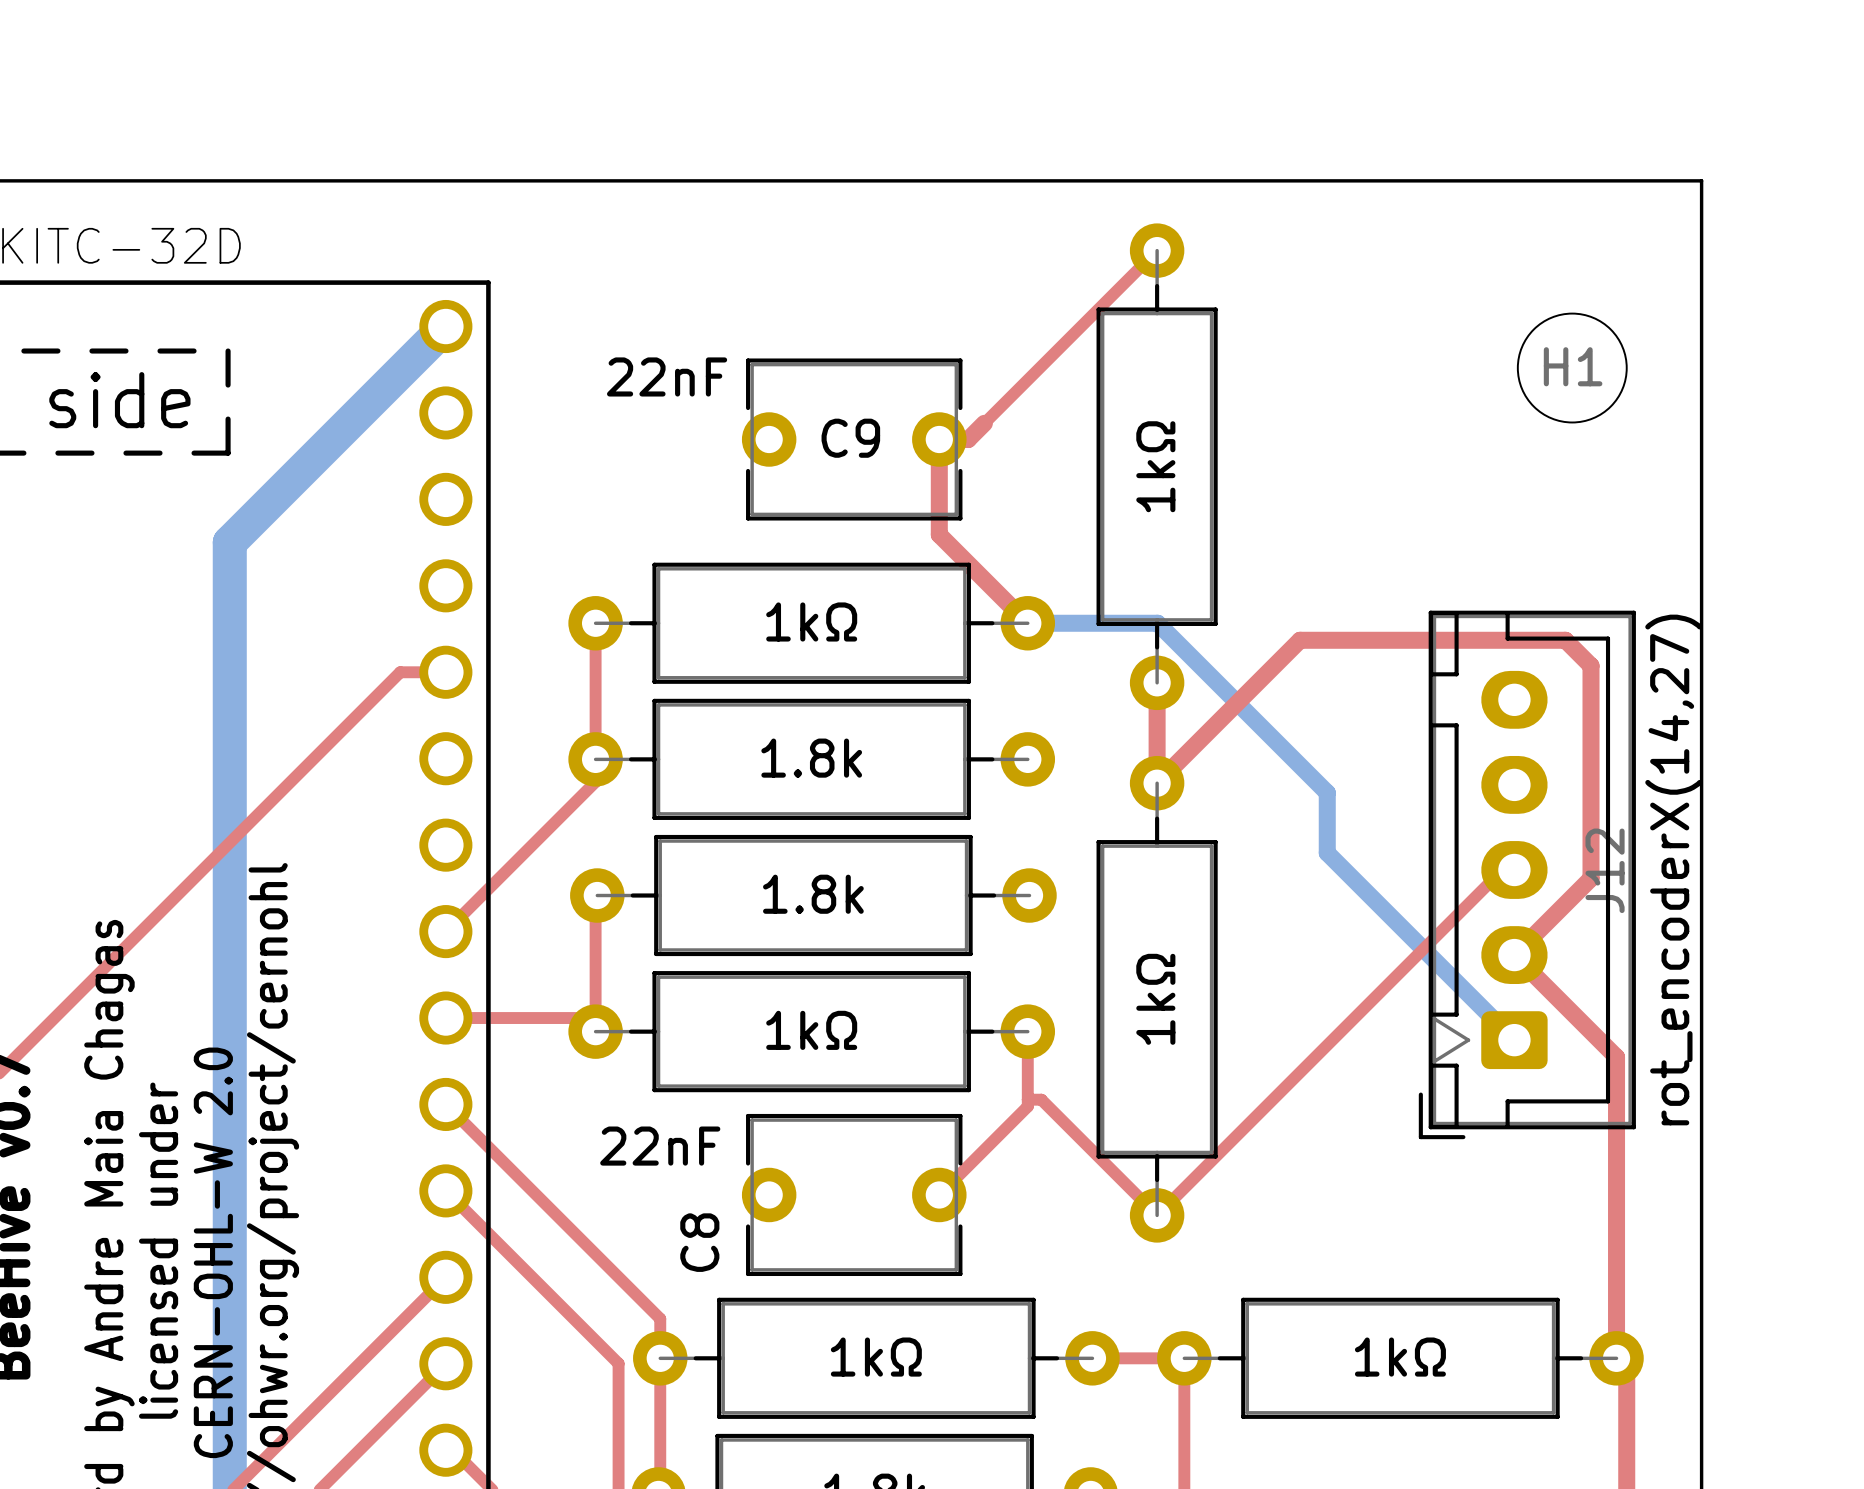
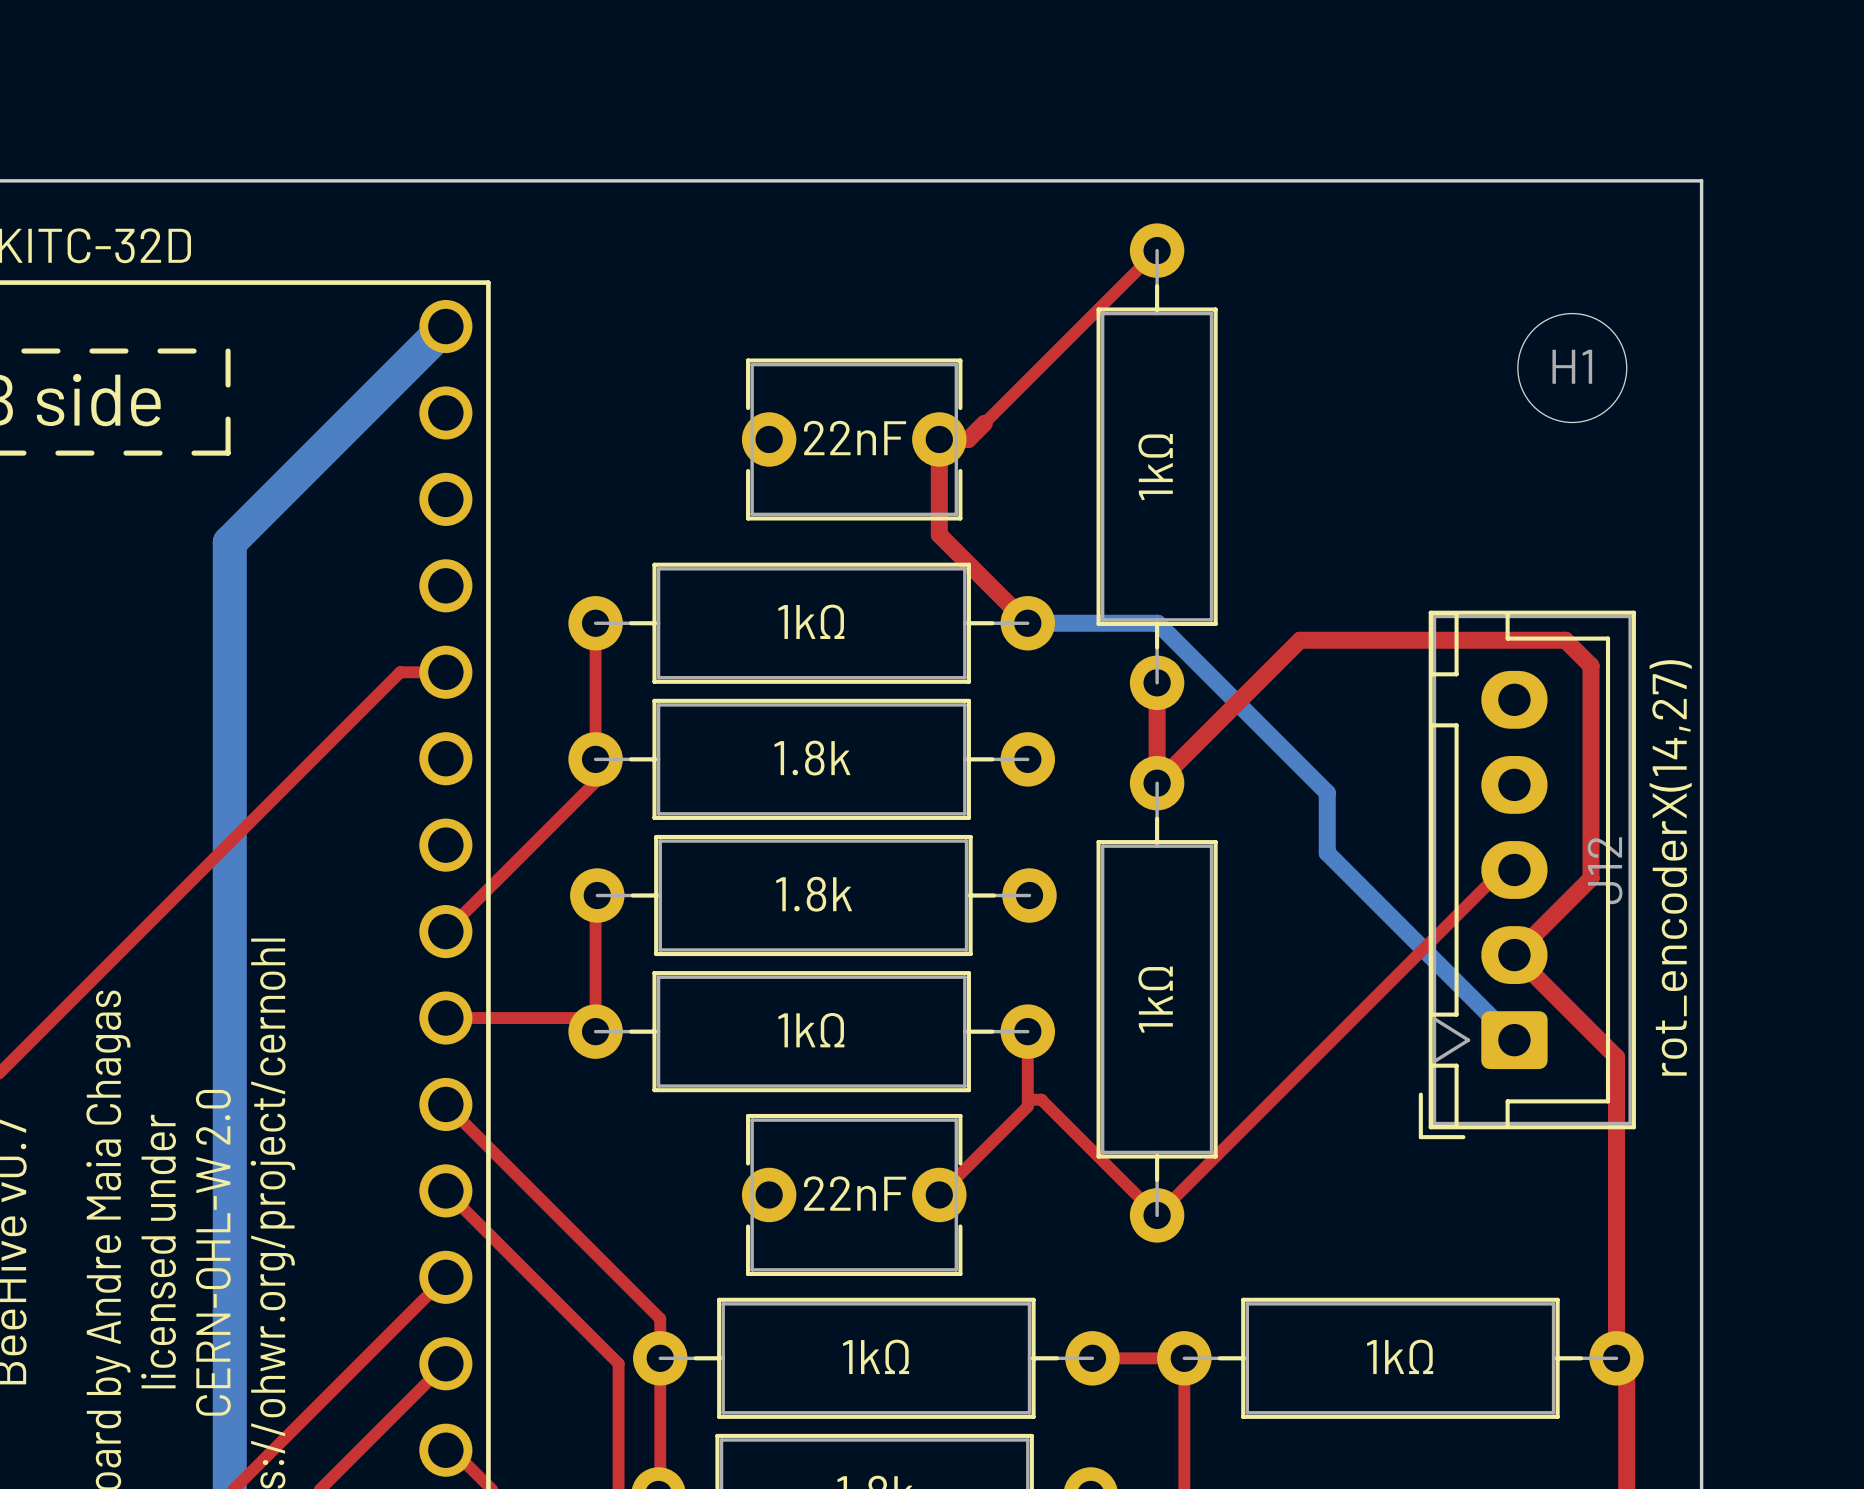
C9 value position: 22nF (667, 376) -> 22nF (855, 438)
C9 name: C9 (850, 438) -> none
C8 value position: 22nF (660, 1146) -> 22nF (855, 1193)
C8 name: C8 (699, 1242) -> none

